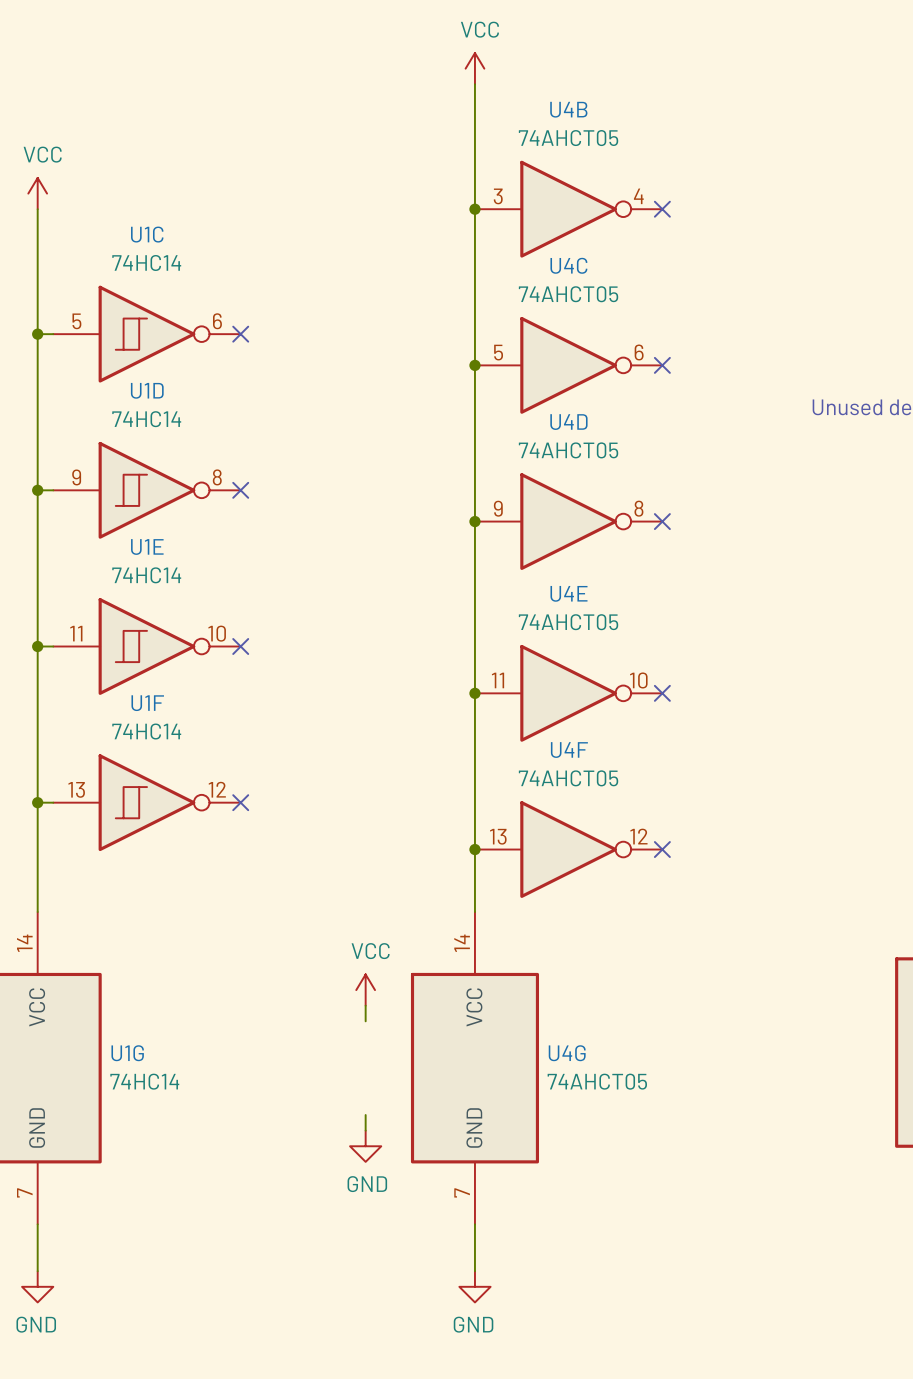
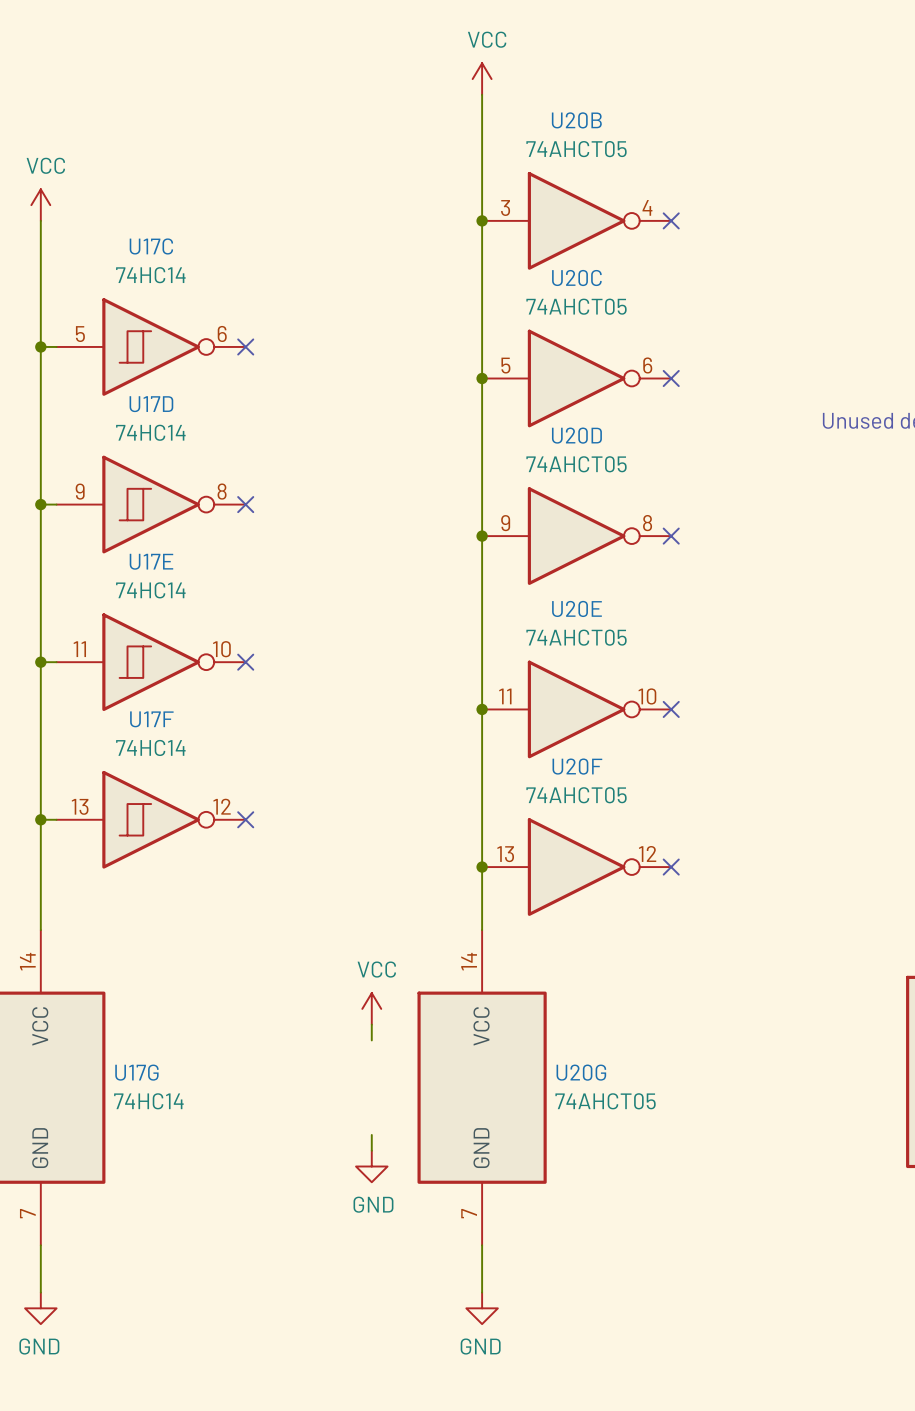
U4B name: U4B (568, 109) -> U20B (576, 120)
U1C name: U1C (147, 234) -> U17C (151, 246)
U4C name: U4C (568, 265) -> U20C (576, 278)
U1D name: U1D (147, 390) -> U17D (151, 404)
U4D name: U4D (568, 422) -> U20D (576, 435)
U1E name: U1E (147, 546) -> U17E (151, 561)
U4E name: U4E (568, 593) -> U20E (576, 608)
U1F name: U1F (147, 703) -> U17F (151, 719)
U4F name: U4F (569, 750) -> U20F (577, 766)
U1G name: U1G (127, 1053) -> U17G (136, 1072)
U4G name: U4G (567, 1053) -> U20G (581, 1072)

